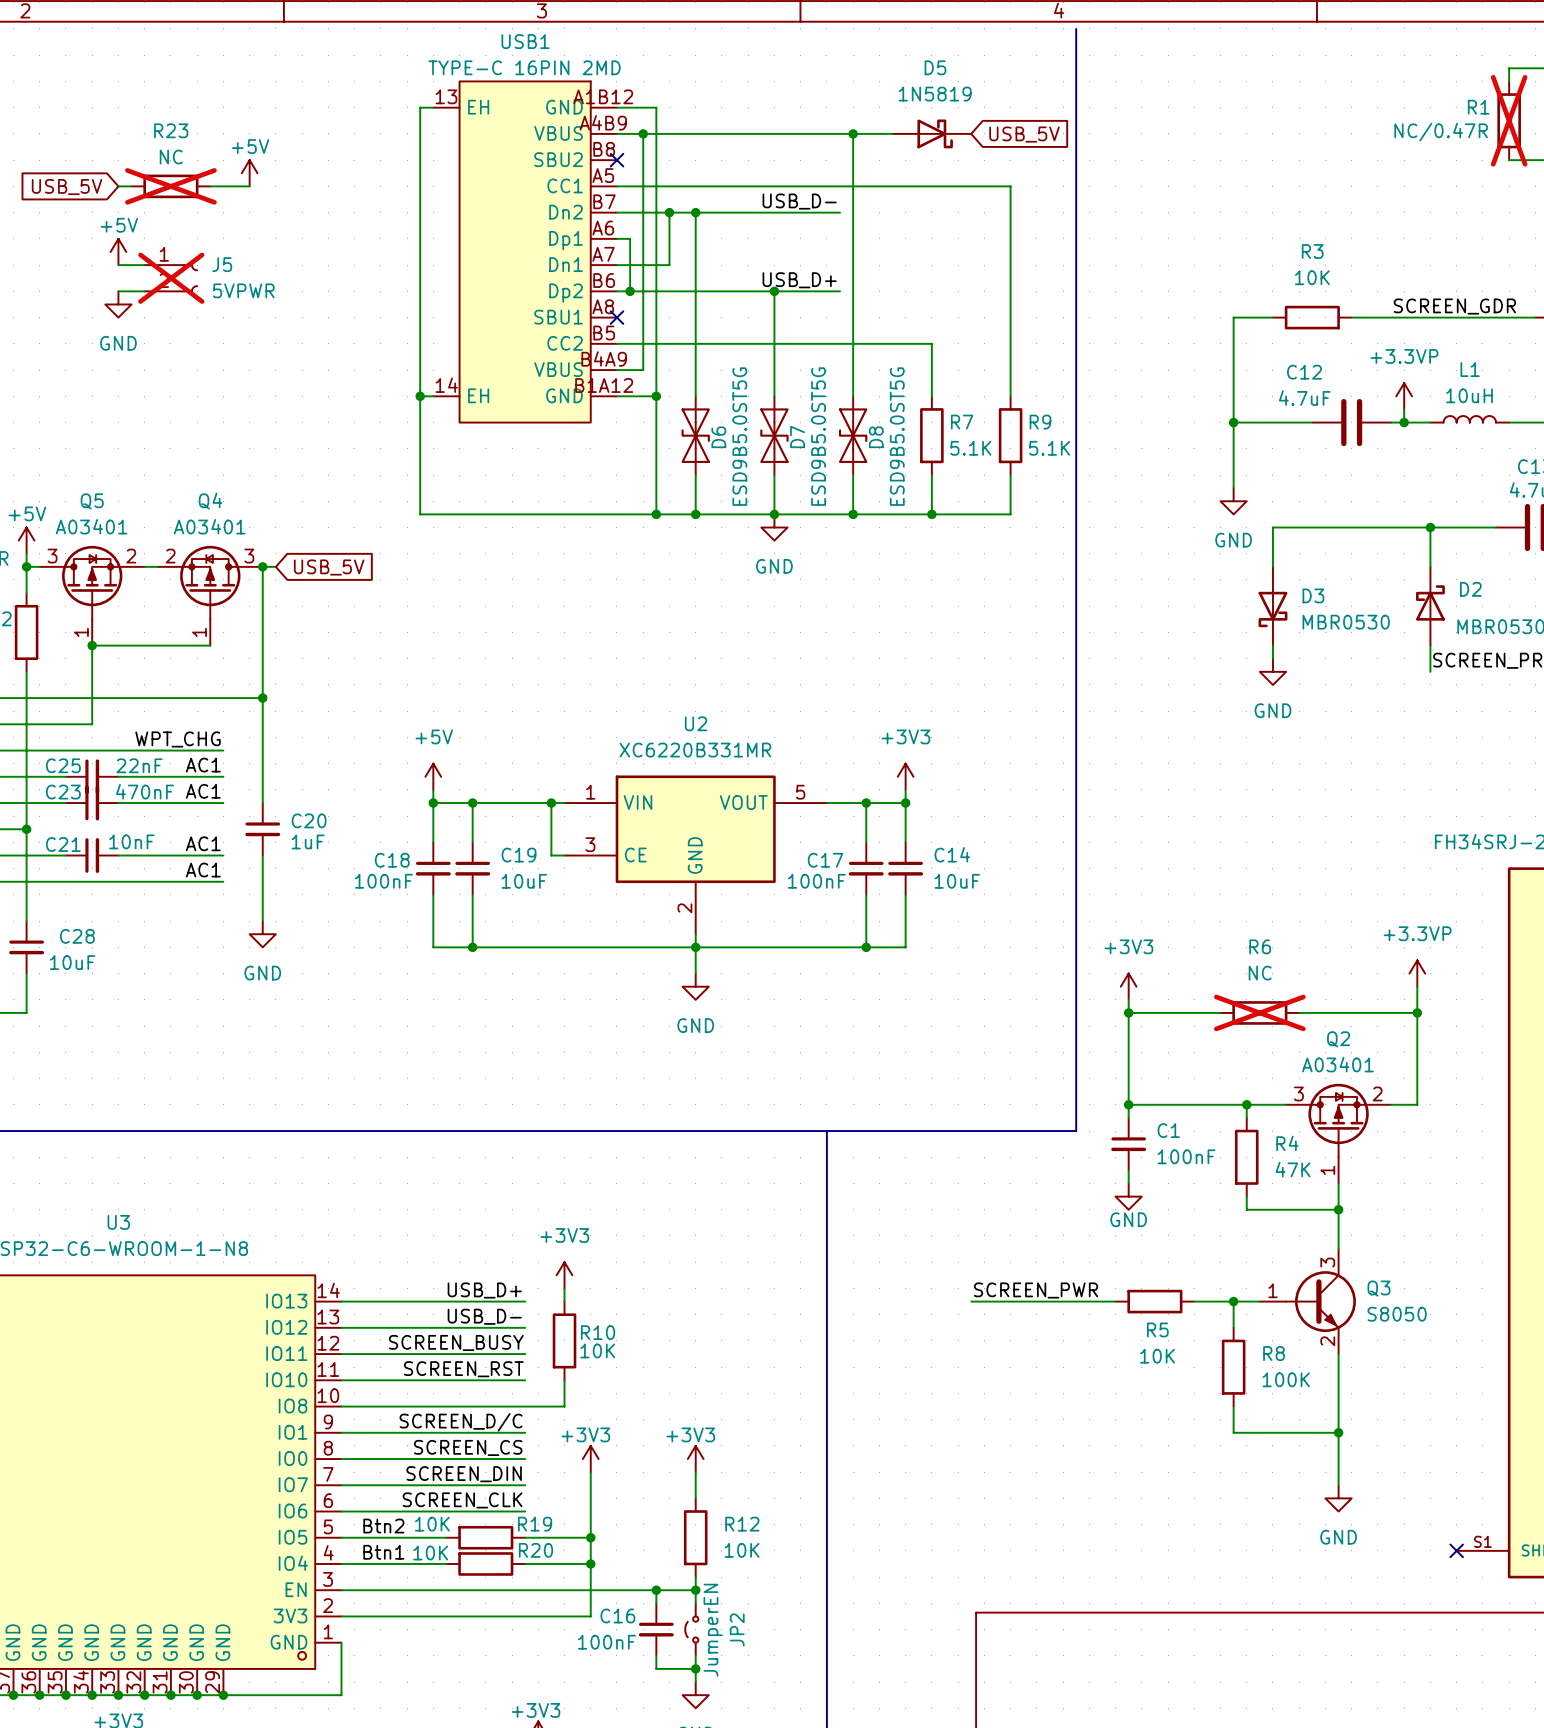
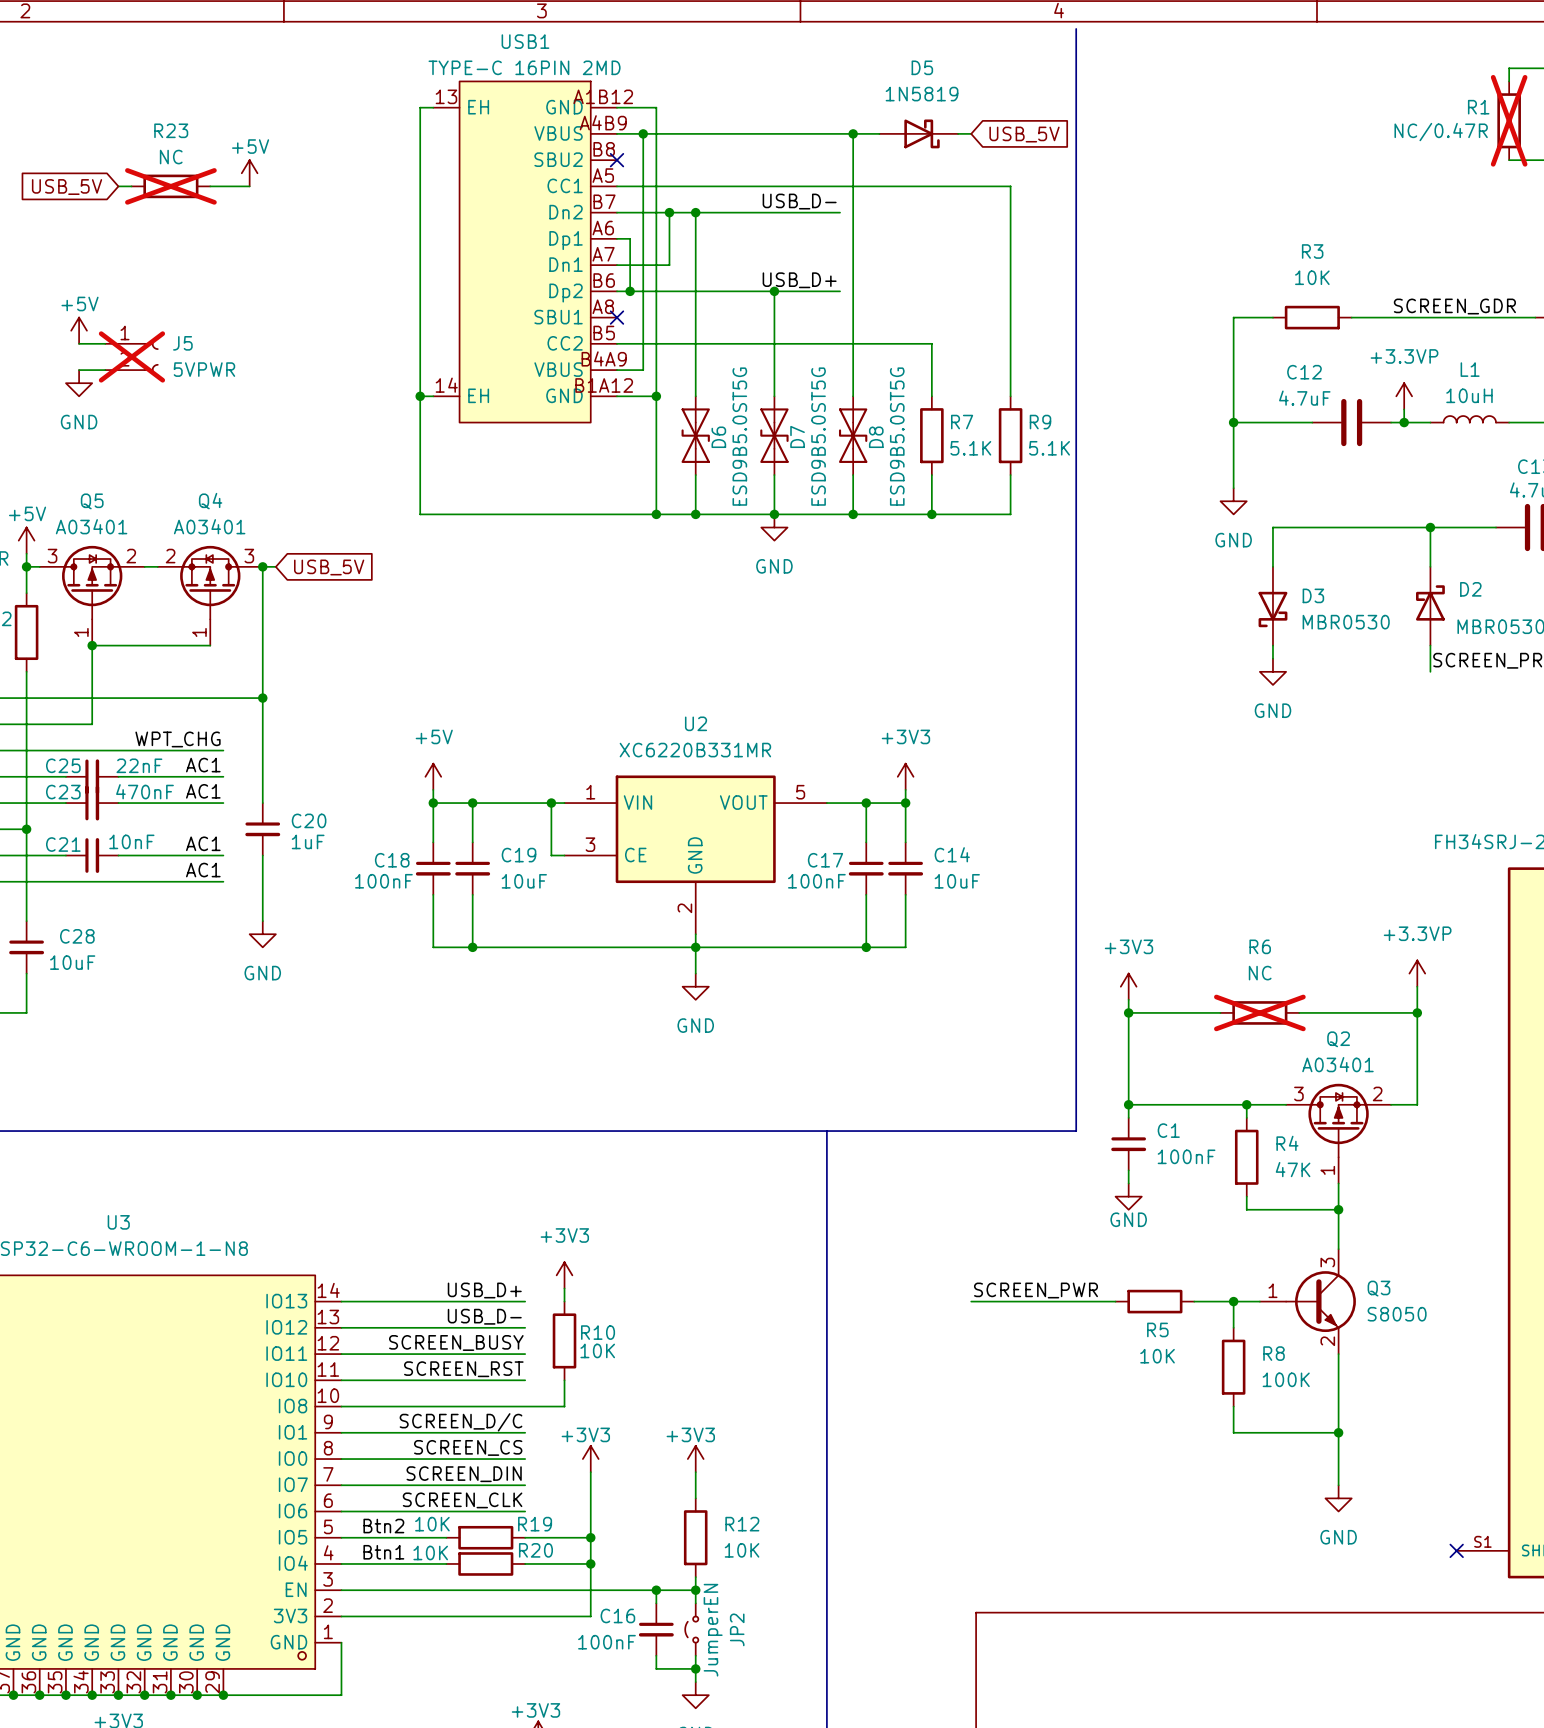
D5 position: (931, 133) -> (918, 133)
power symbol position: +5V (118, 251) -> +5V (79, 330)
wire: (118, 265) (144, 265) -> (79, 343) (105, 343)
J5 position: (171, 278) -> (131, 356)
wire: (118, 291) (144, 291) -> (79, 370) (105, 370)
power symbol position: GND (118, 304) -> GND (79, 383)

